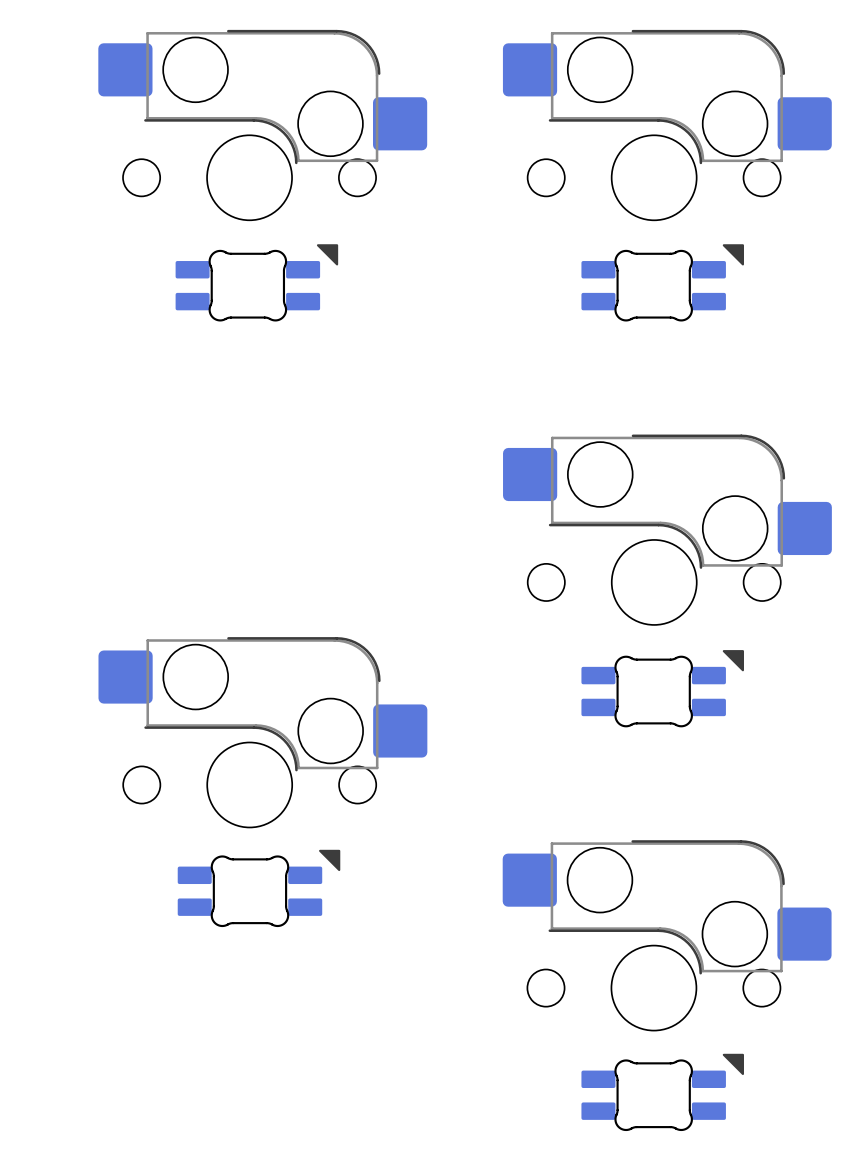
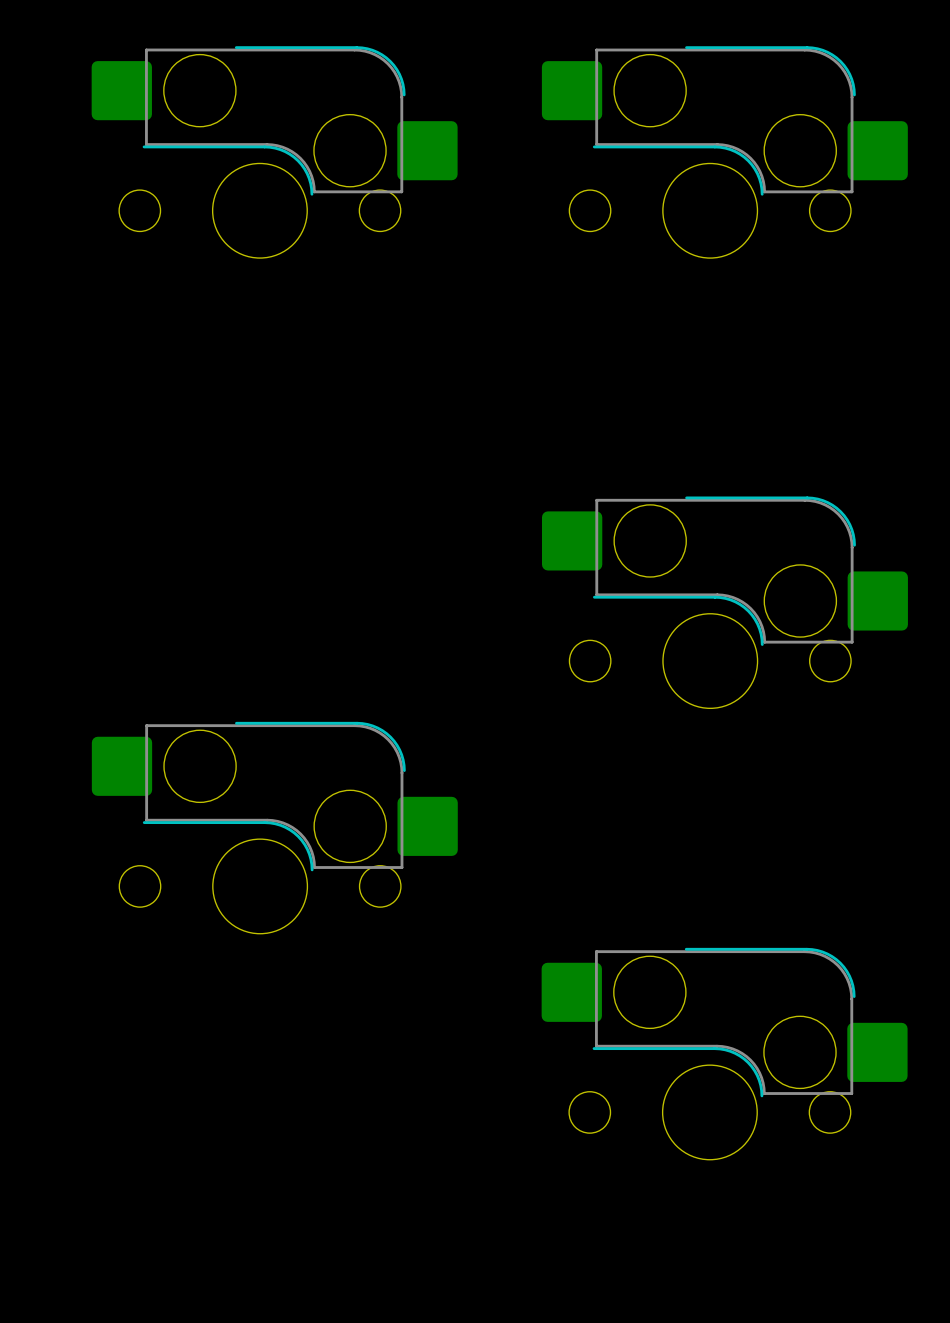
part: (256, 282) -> none
part: (662, 282) -> none
part: (662, 688) -> none
part: (259, 888) -> none
part: (662, 1092) -> none

